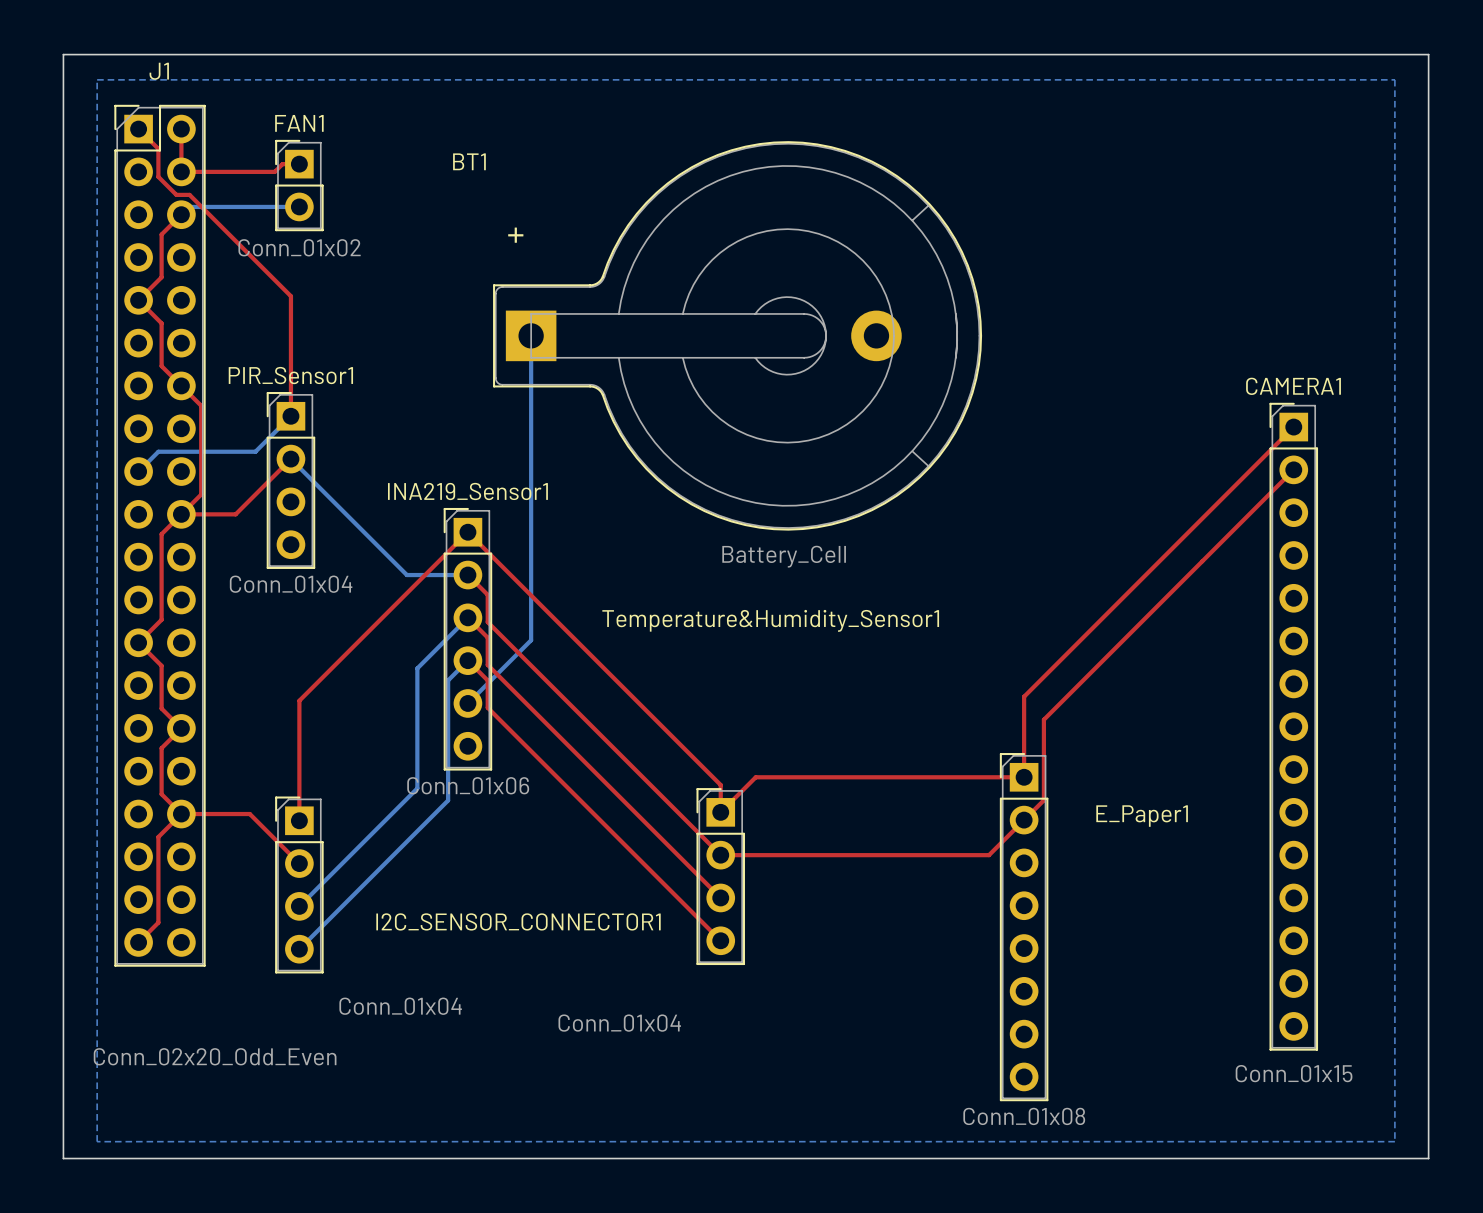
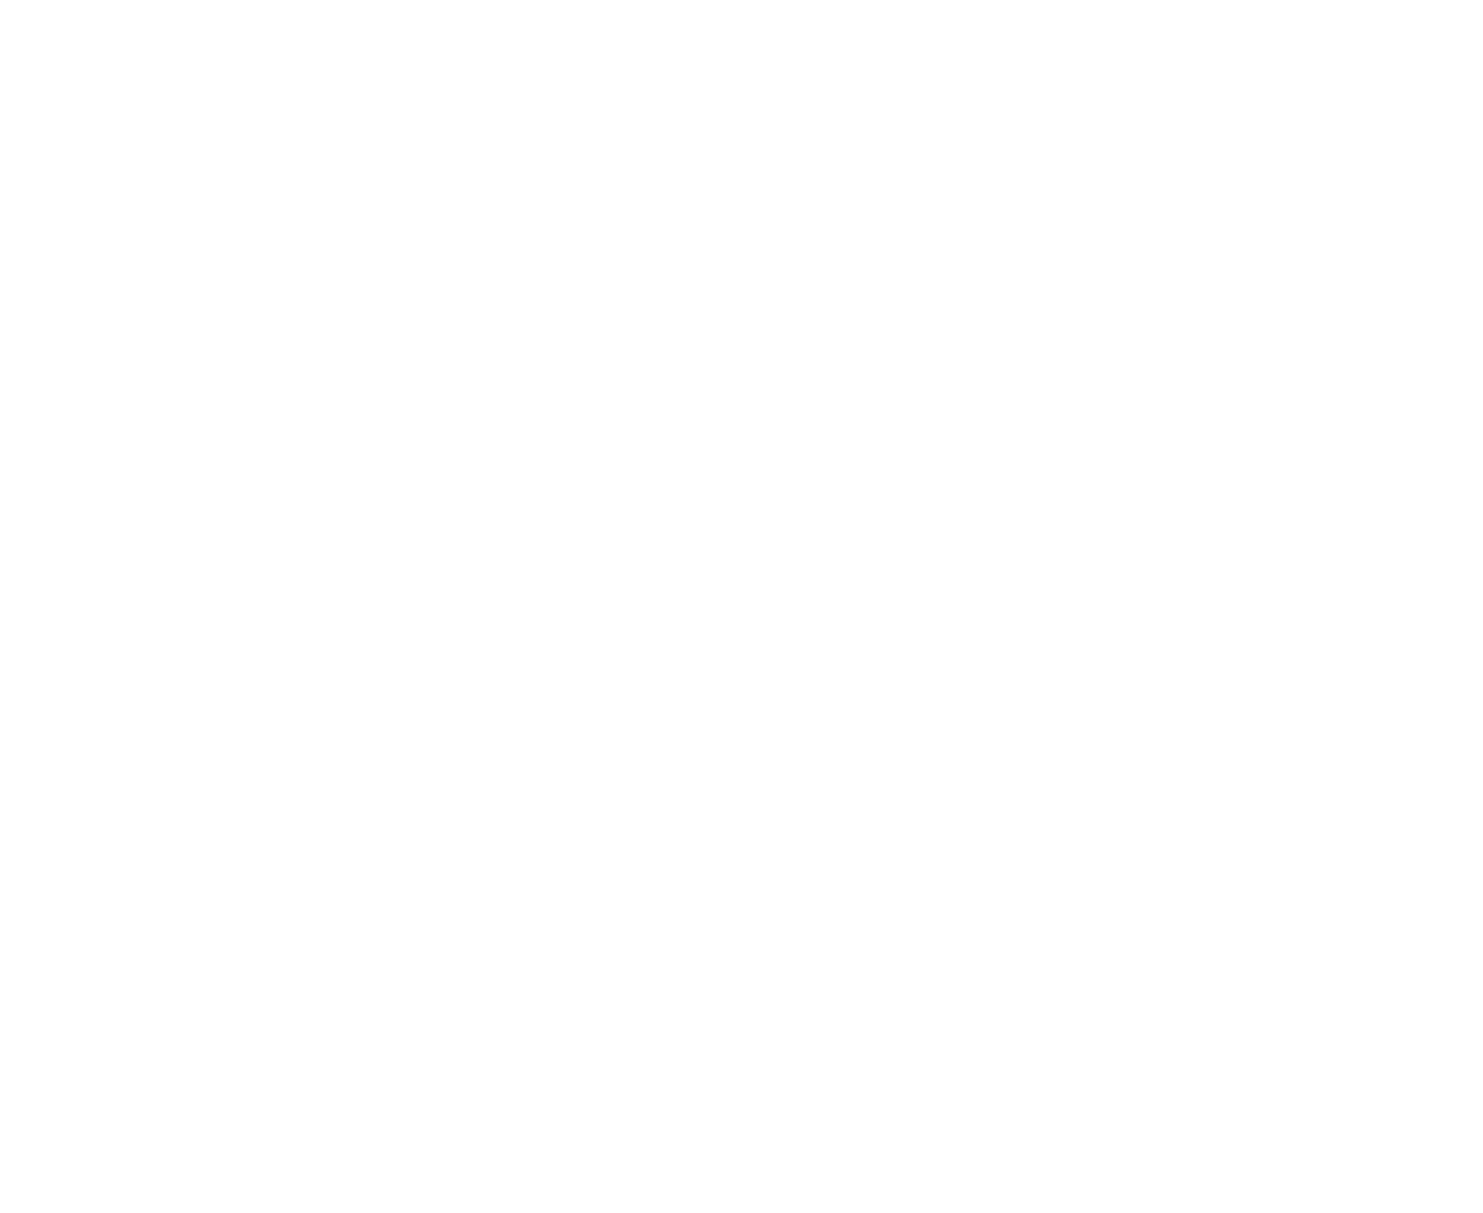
board edge: (63, 54) (1428, 54) (1428, 1158) (63, 1158) (63, 54) -> none
bottom zone outline: (97, 79) (1394, 79) (1394, 1141) (97, 1141) (97, 79) -> none
top track: (138, 129) (158, 148) (158, 176) (176, 194) (189, 194) (290, 296) (290, 416) -> none
top track: (181, 129) (181, 171) (274, 171) (282, 164) (299, 164) -> none
FAN1: Conn_01x02 (299, 185) -> none
bottom track: (299, 206) (189, 206) (181, 214) -> none
top track: (181, 214) (161, 234) (161, 277) (138, 300) (161, 323) (161, 366) (201, 405) (201, 494) (161, 534) (161, 619) (138, 642) (161, 665) (161, 708) (181, 728) (161, 748) (161, 794) (181, 814) -> none
bottom track: (531, 335) (531, 640) (467, 703) -> none
BT1: Battery_Cell (737, 335) -> none
bottom track: (290, 416) (255, 451) (158, 451) (138, 471) -> none
top track: (1293, 427) (1024, 696) (1024, 777) (755, 777) (720, 812) (720, 785) (467, 532) (299, 700) (299, 820) -> none
top track: (290, 459) (235, 514) (181, 514) -> none
bottom track: (290, 459) (406, 575) (467, 575) -> none
top track: (1293, 469) (1043, 719) (1043, 800) (989, 855) (720, 855) (487, 622) (487, 594) (467, 575) -> none
PIR_Sensor1: Conn_01x04 (290, 480) -> none
J1: Conn_02x20_Odd_Even (160, 535) -> none
top track: (467, 617) (487, 637) (487, 664) (720, 897) -> none
bottom track: (467, 617) (417, 668) (417, 788) (299, 906) -> none
INA219_Sensor1: Conn_01x06 (467, 639) -> none
top track: (467, 660) (487, 680) (487, 707) (720, 940) -> none
bottom track: (467, 660) (448, 680) (448, 800) (299, 949) -> none
CAMERA1: Conn_01x15 (1293, 726) -> none
top track: (181, 814) (158, 837) (158, 922) (138, 942) -> none
top track: (181, 814) (249, 814) (299, 863) -> none
Temperature&Humidity_Sensor1: Conn_01x04 (720, 876) -> none
I2C_SENSOR_CONNECTOR1: Conn_01x04 (299, 884) -> none
E_Paper1: Conn_01x08 (1024, 927) -> none

